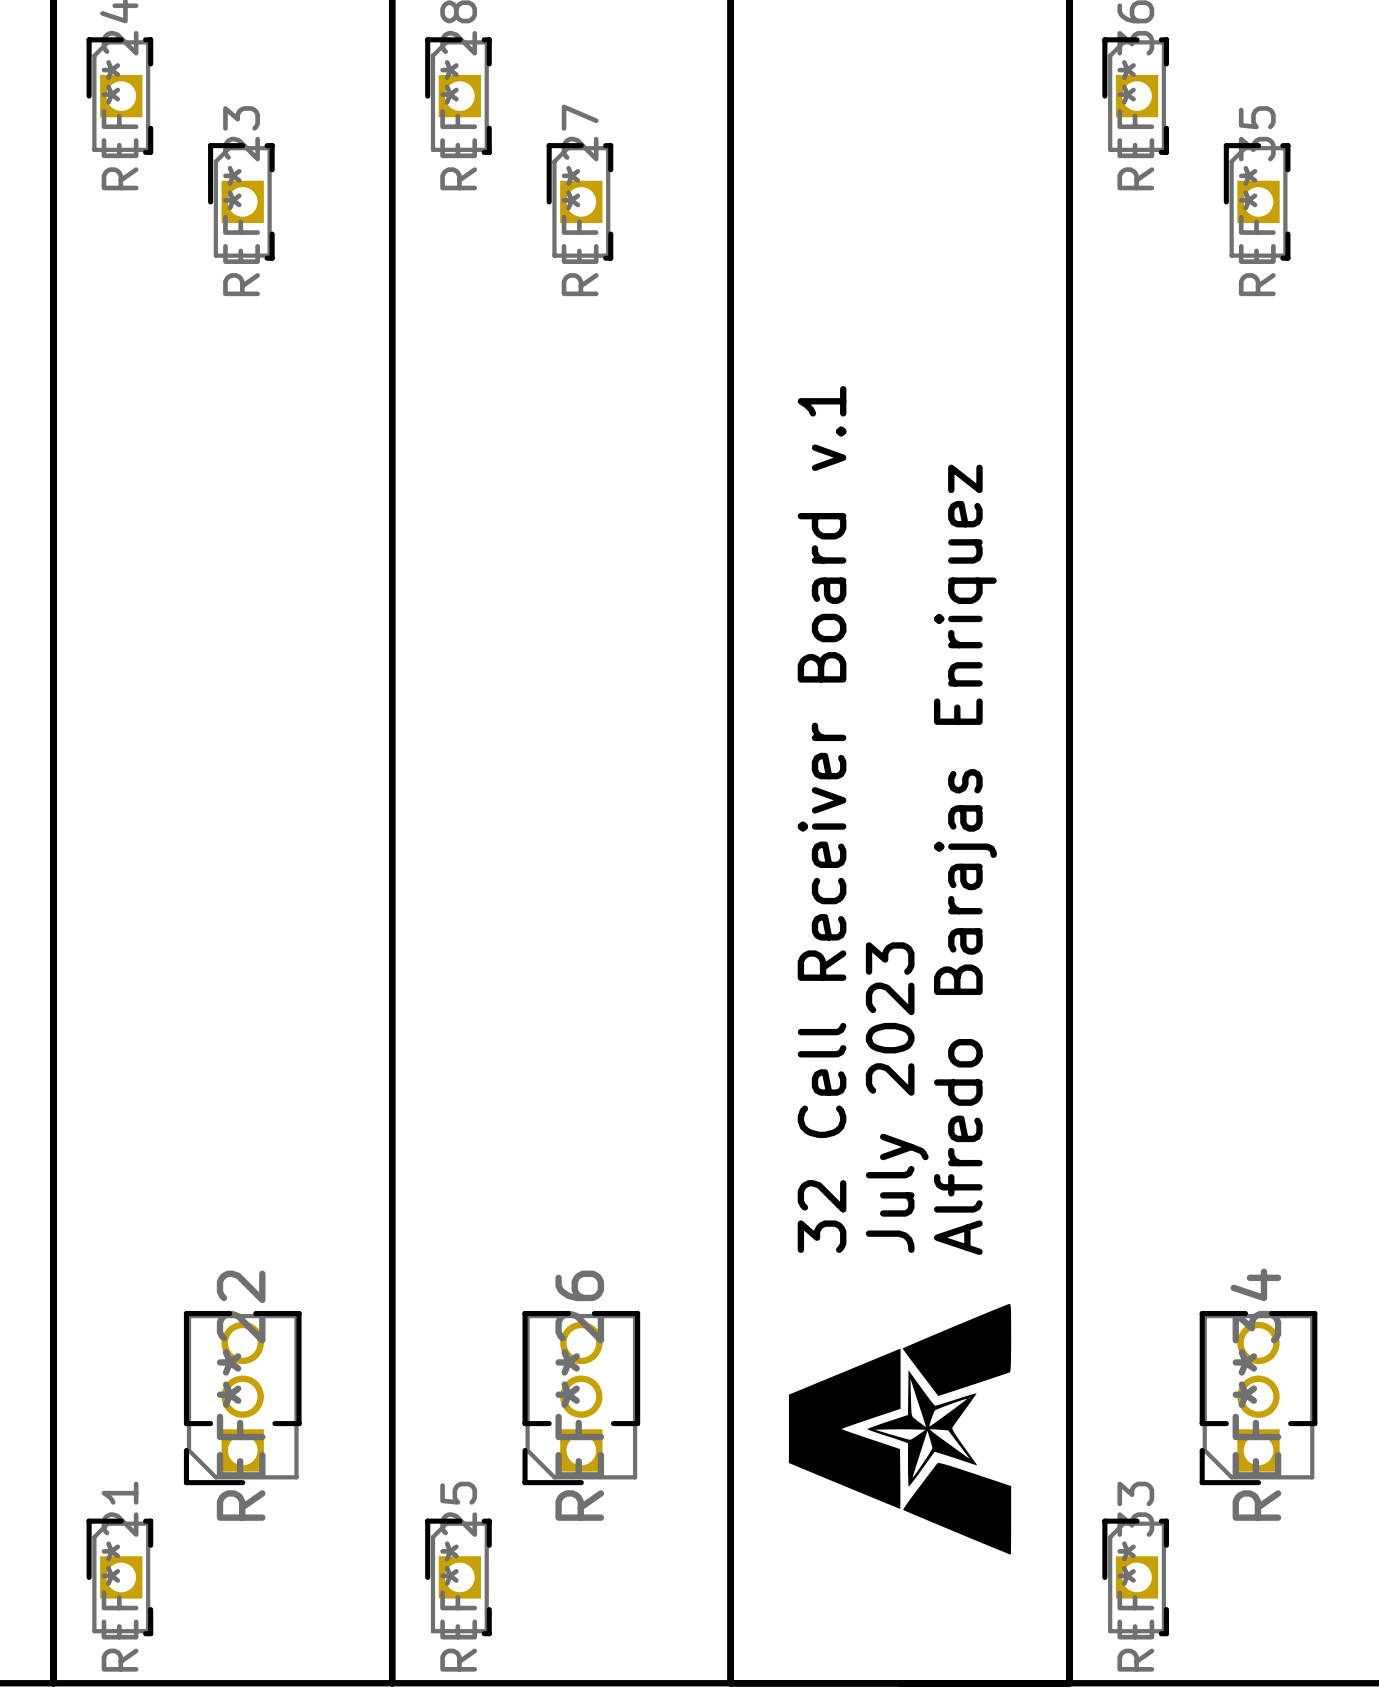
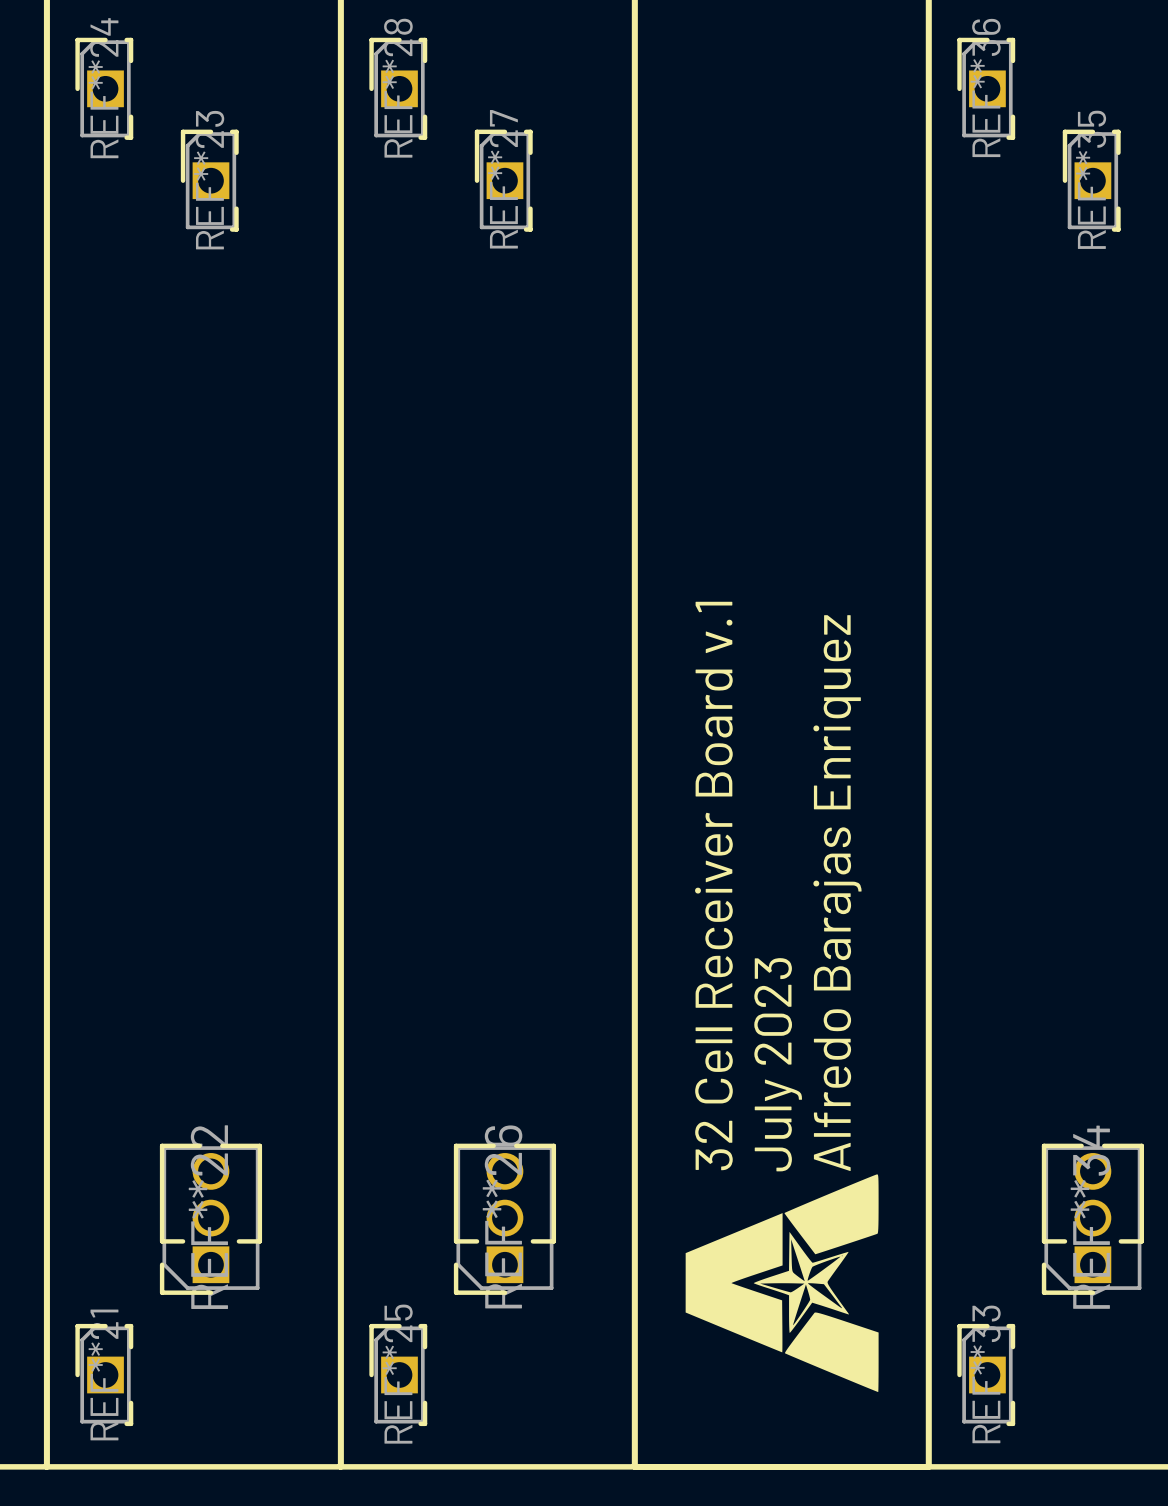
text position: 32 Cell Receiver Board v.1 (822, 819) -> 32 Cell Receiver Board v.1 (713, 886)
text position: Alfredo Barajas Enriquez (965, 859) -> Alfredo Barajas Enriquez (837, 893)
text position: July 2023 (897, 1097) -> July 2023 (778, 1064)
drawing position: (900, 1429) -> (782, 1283)

